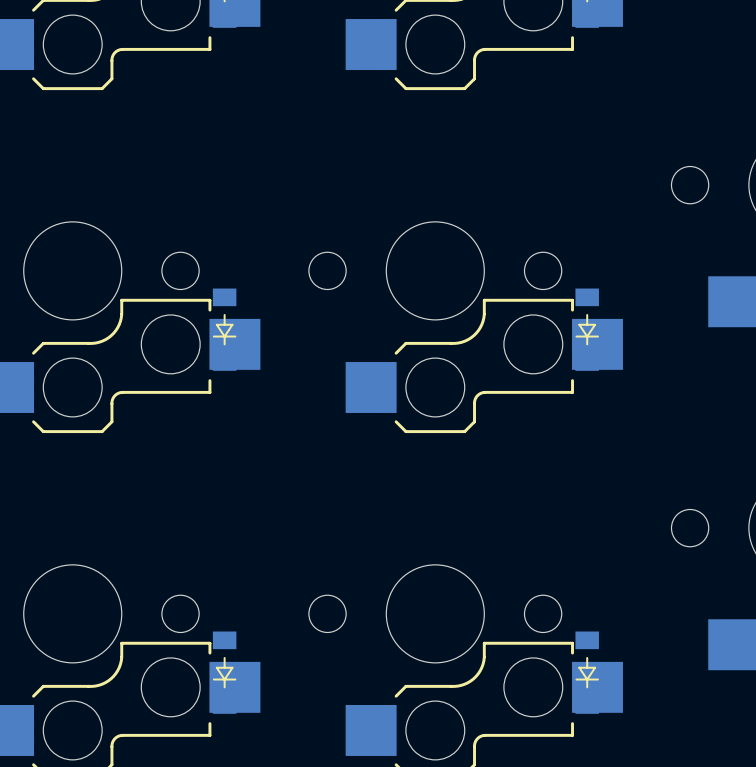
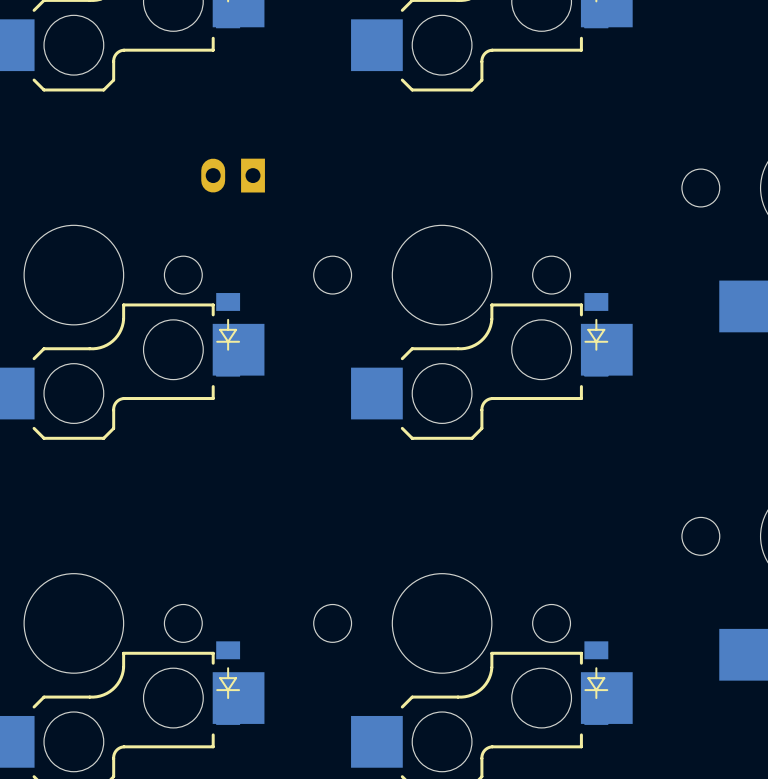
part: none -> (233, 175)

